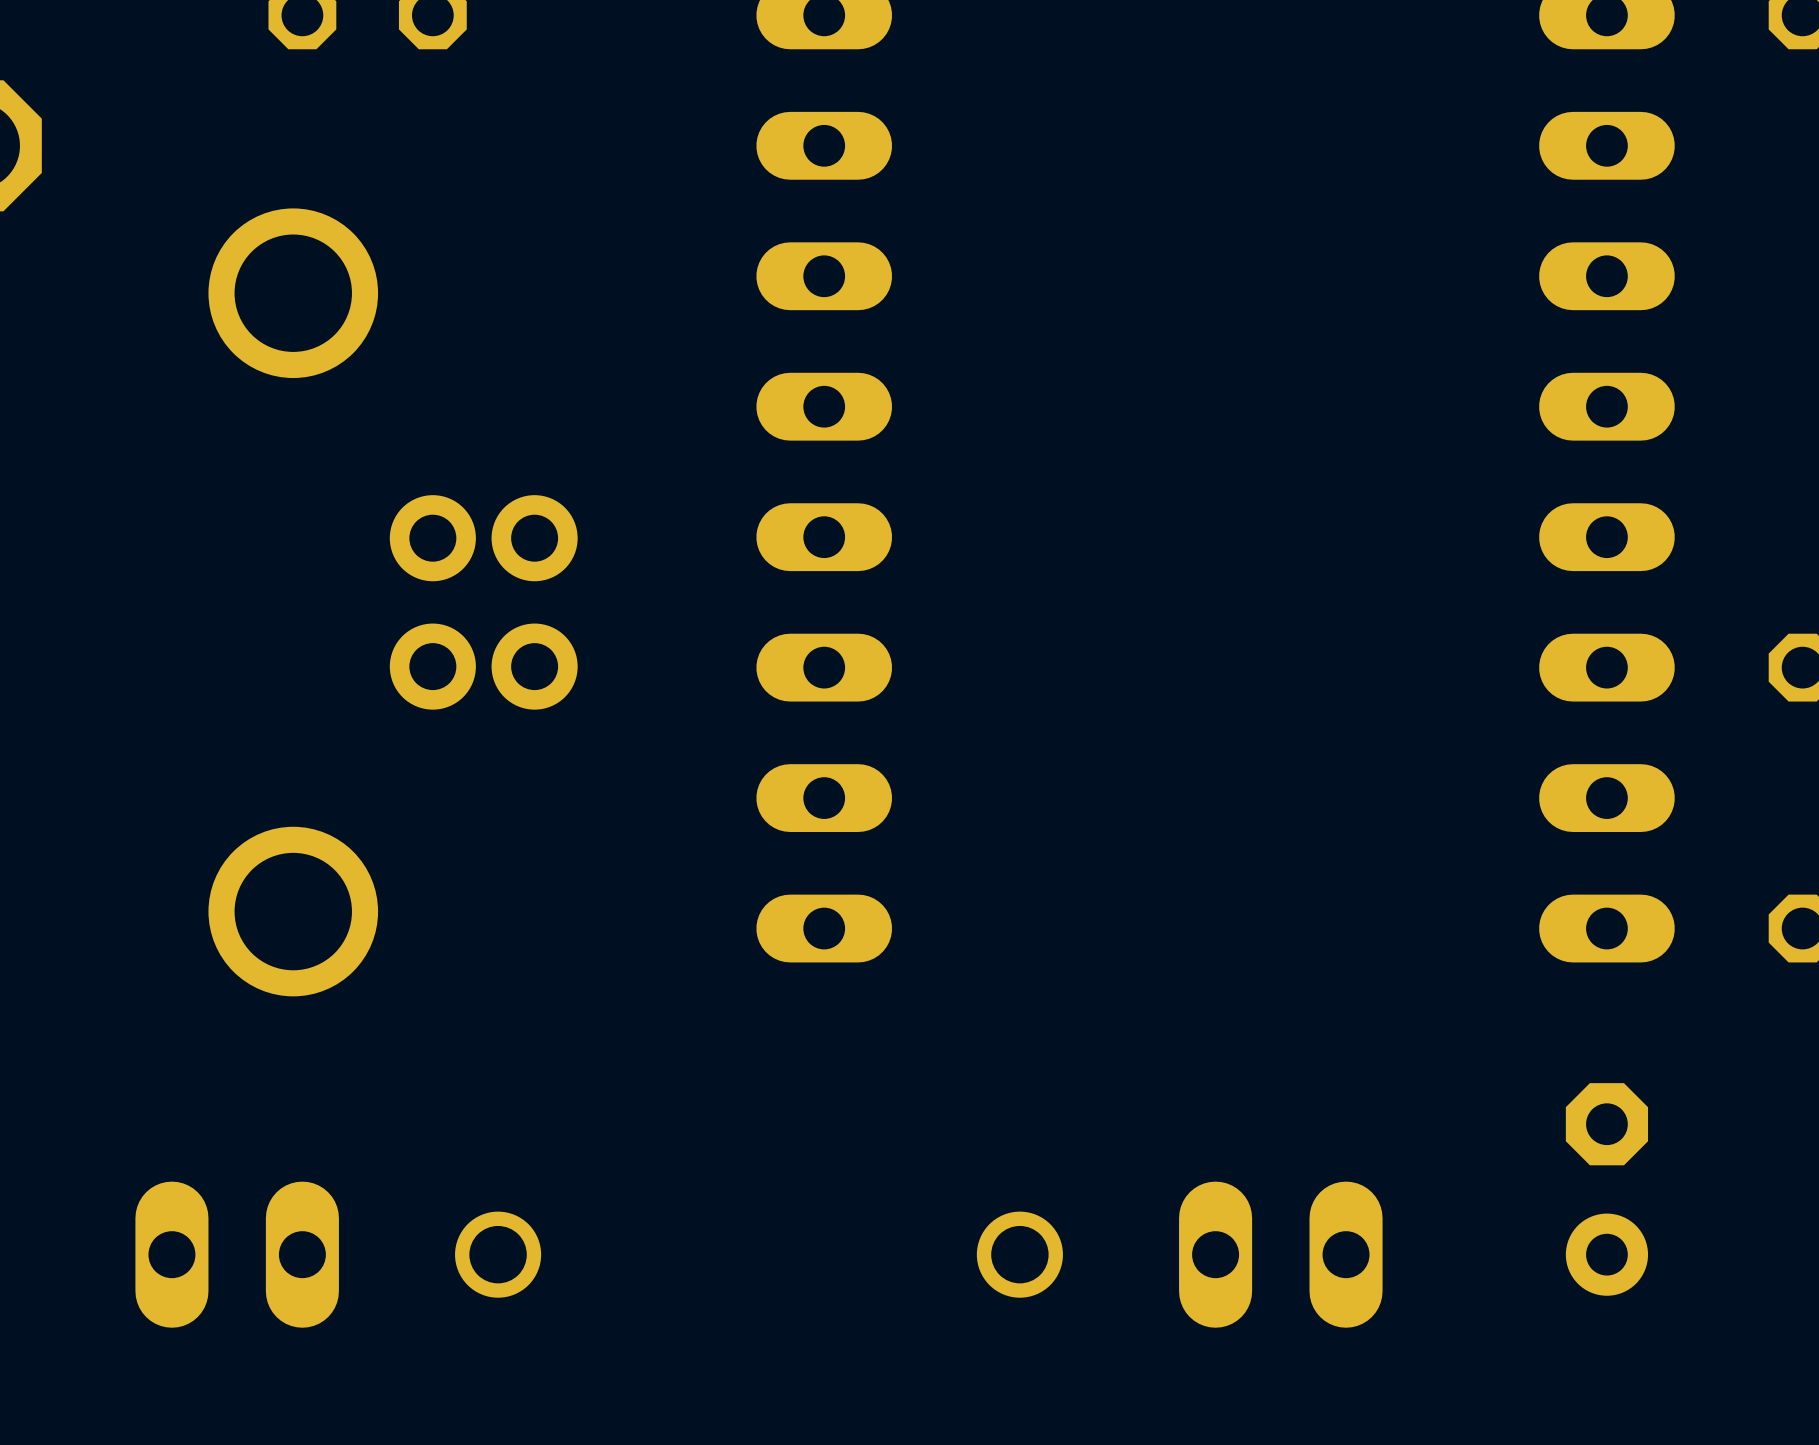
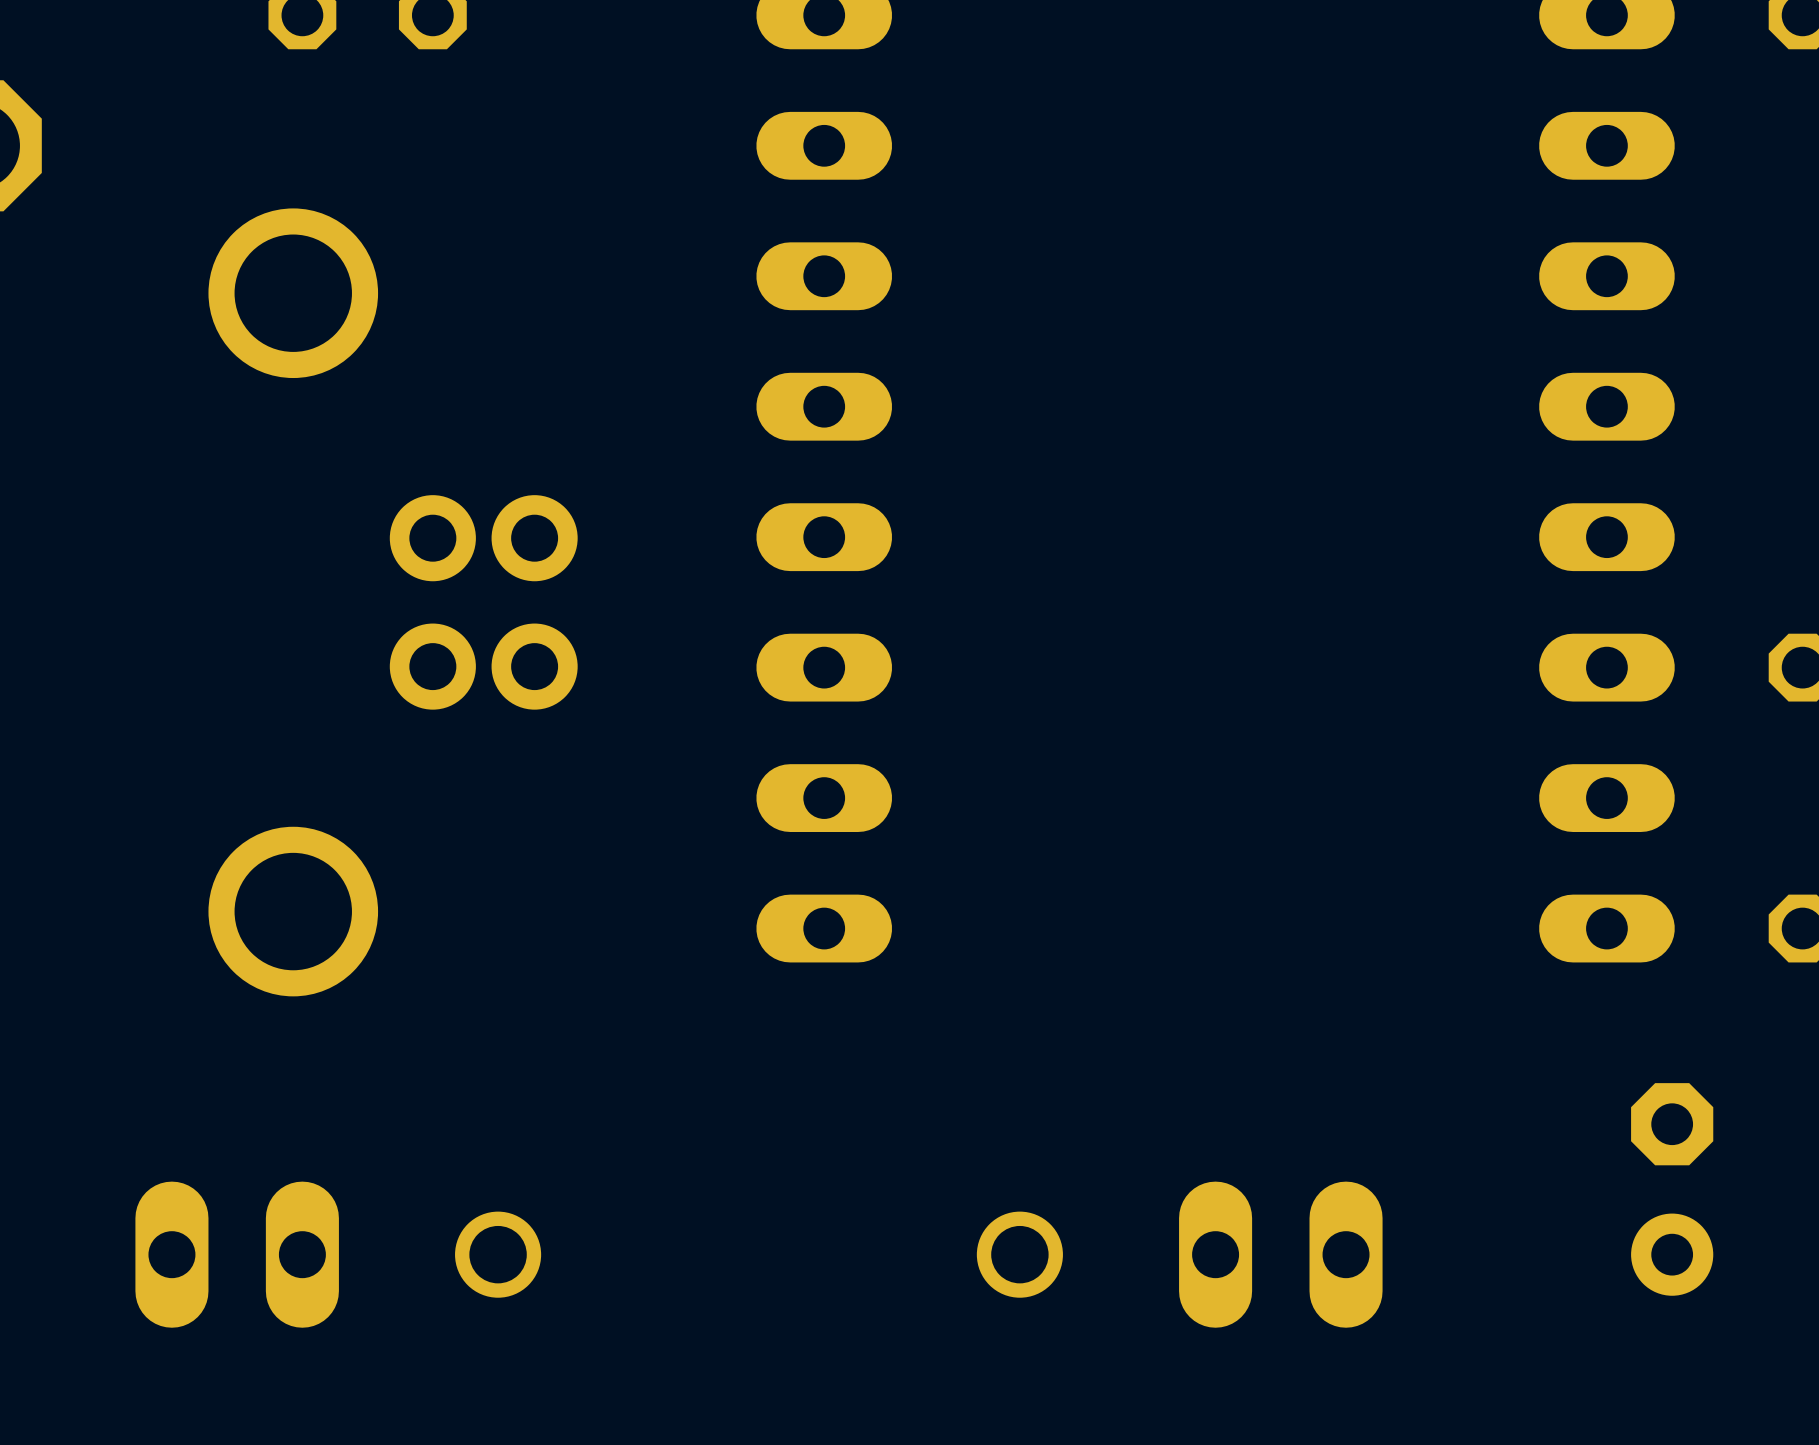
part position: (1606, 1189) -> (1672, 1189)

